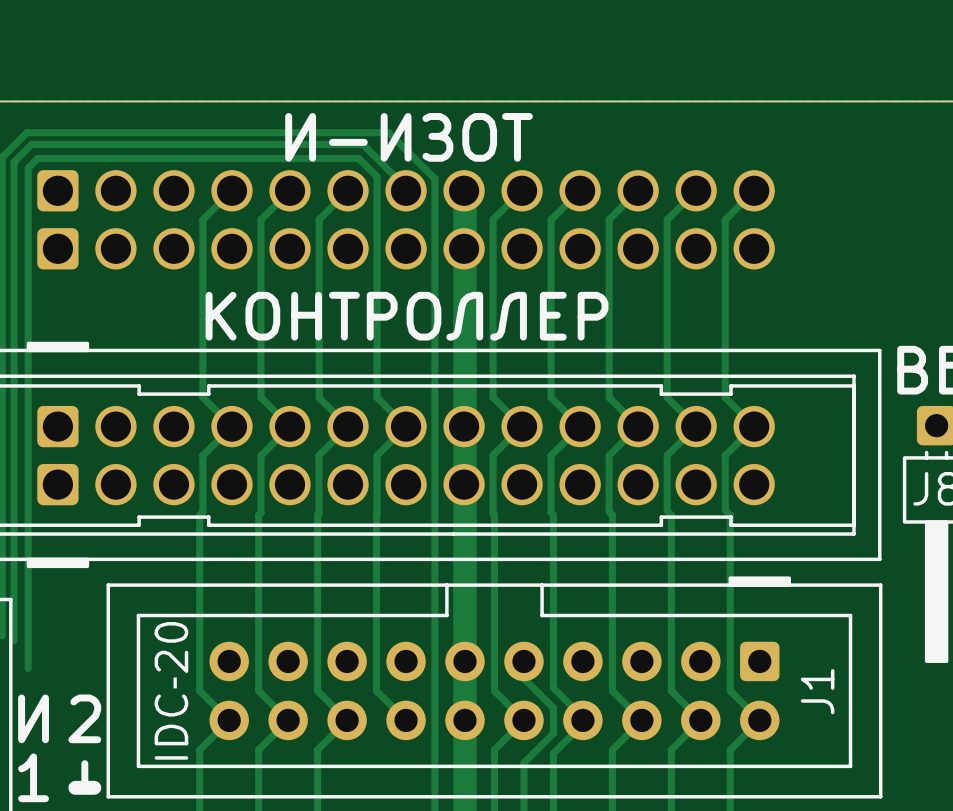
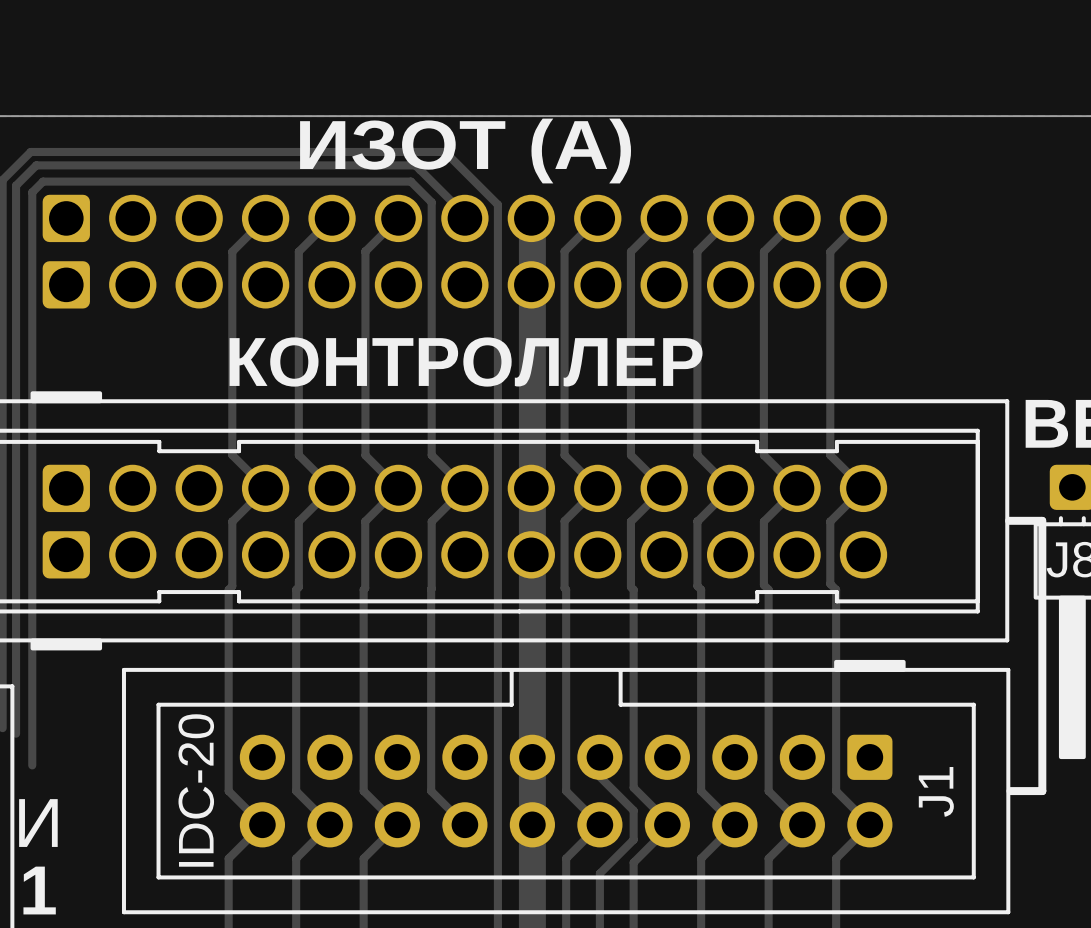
text: И-ИЗОТ (409, 137) -> ИЗОТ (A) (465, 151)
line: none -> (1009, 520) (1042, 520)
line: none -> (1042, 520) (1042, 791) (1010, 791)
text: 2 (84, 718) -> none
line: (84, 763) (84, 787) -> none
line: (75, 787) (94, 787) -> none

